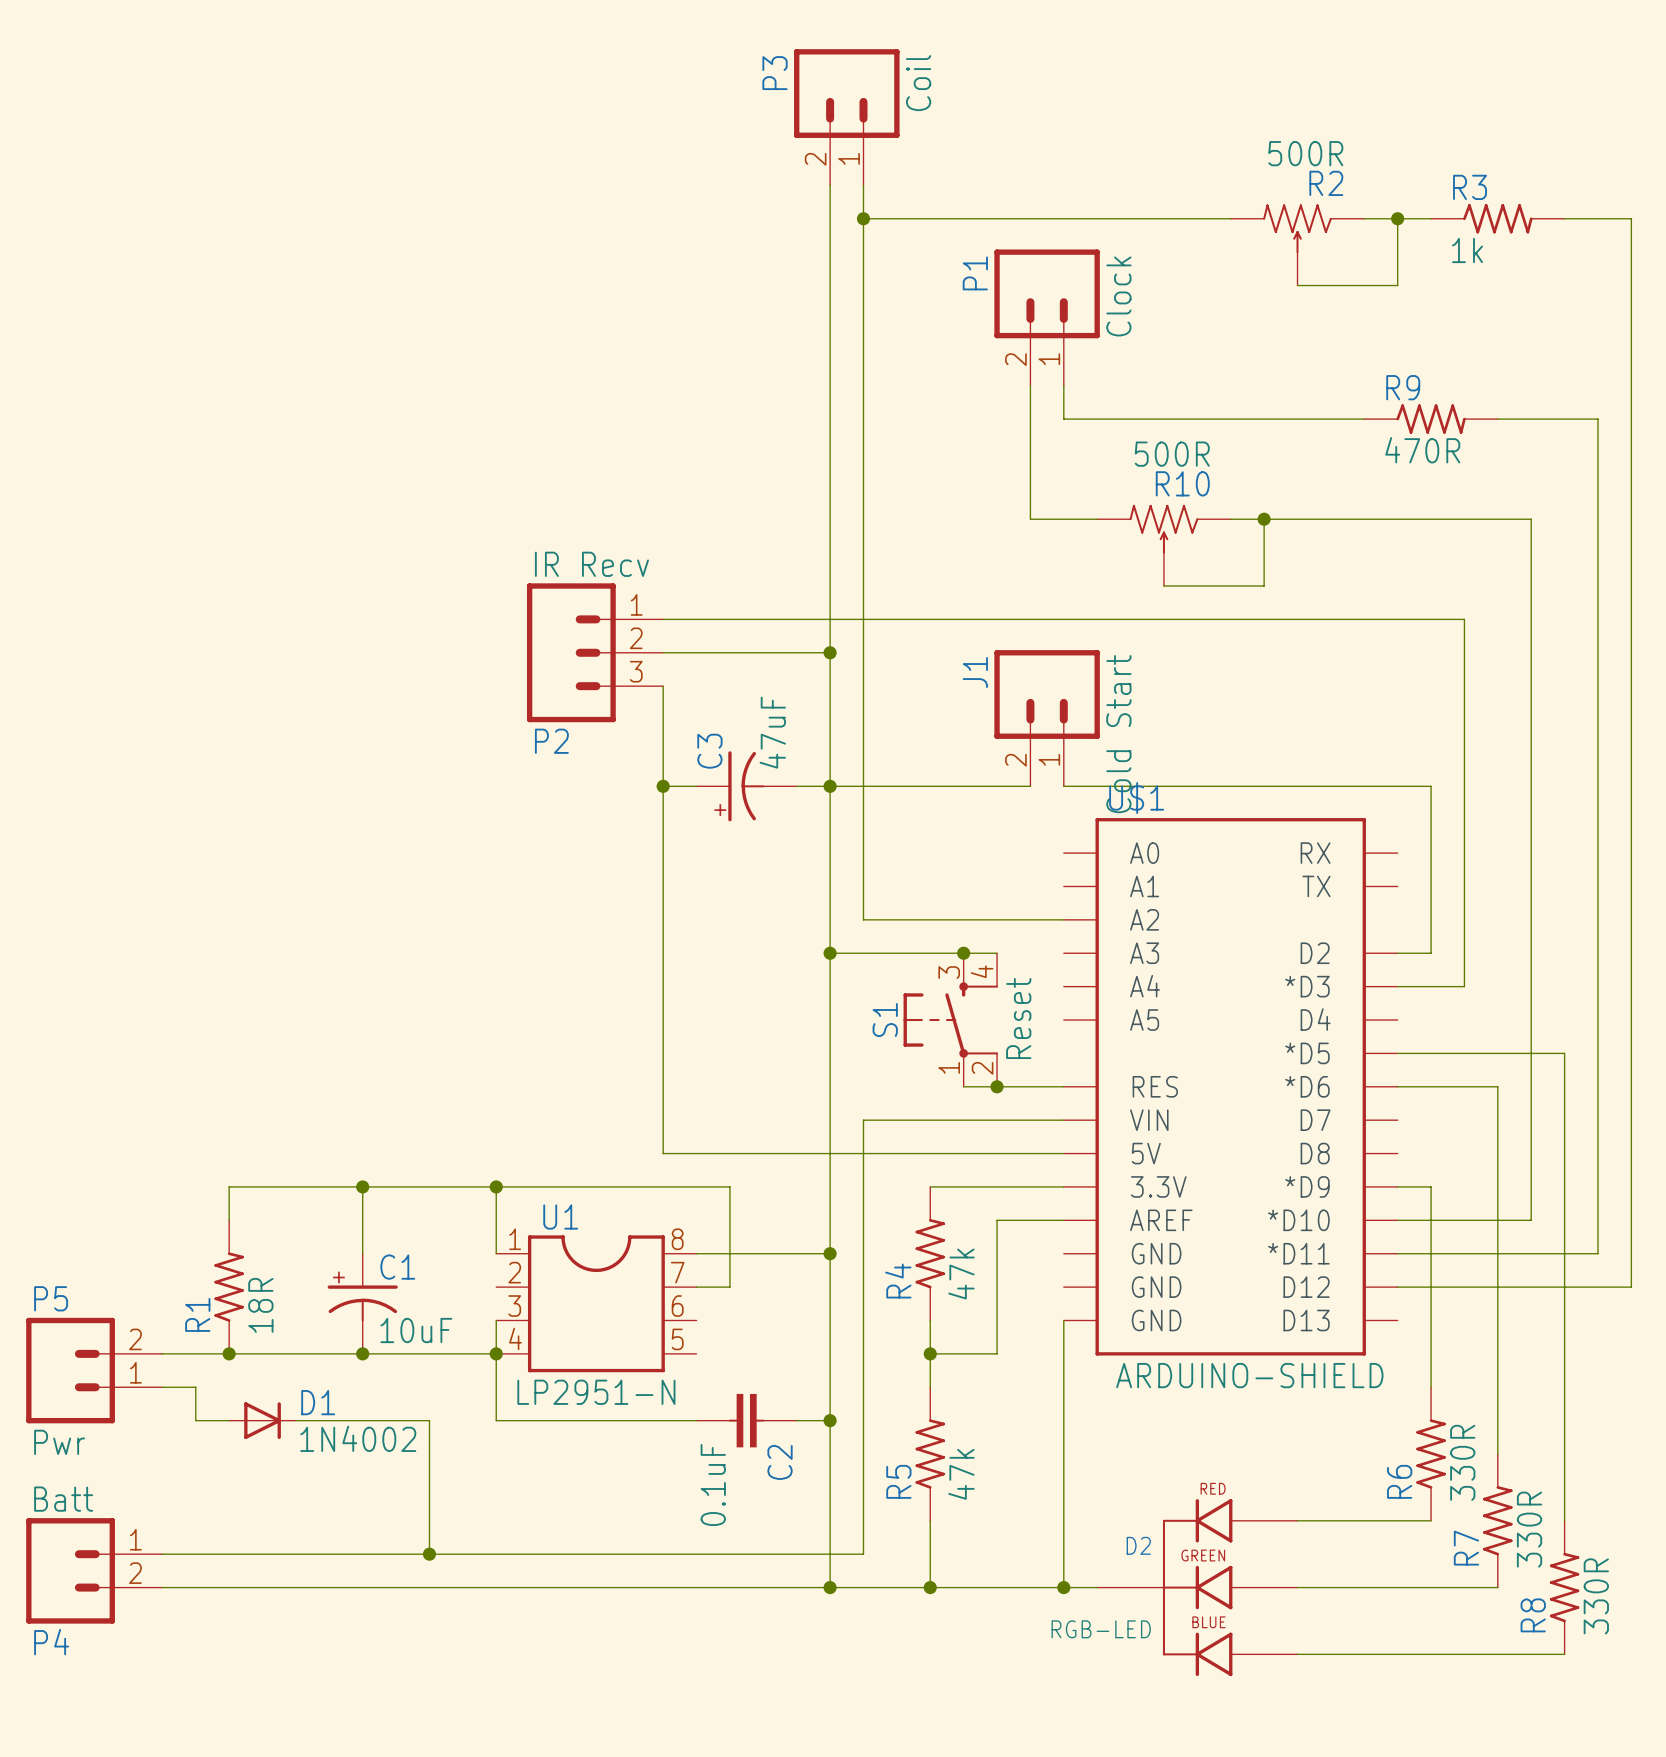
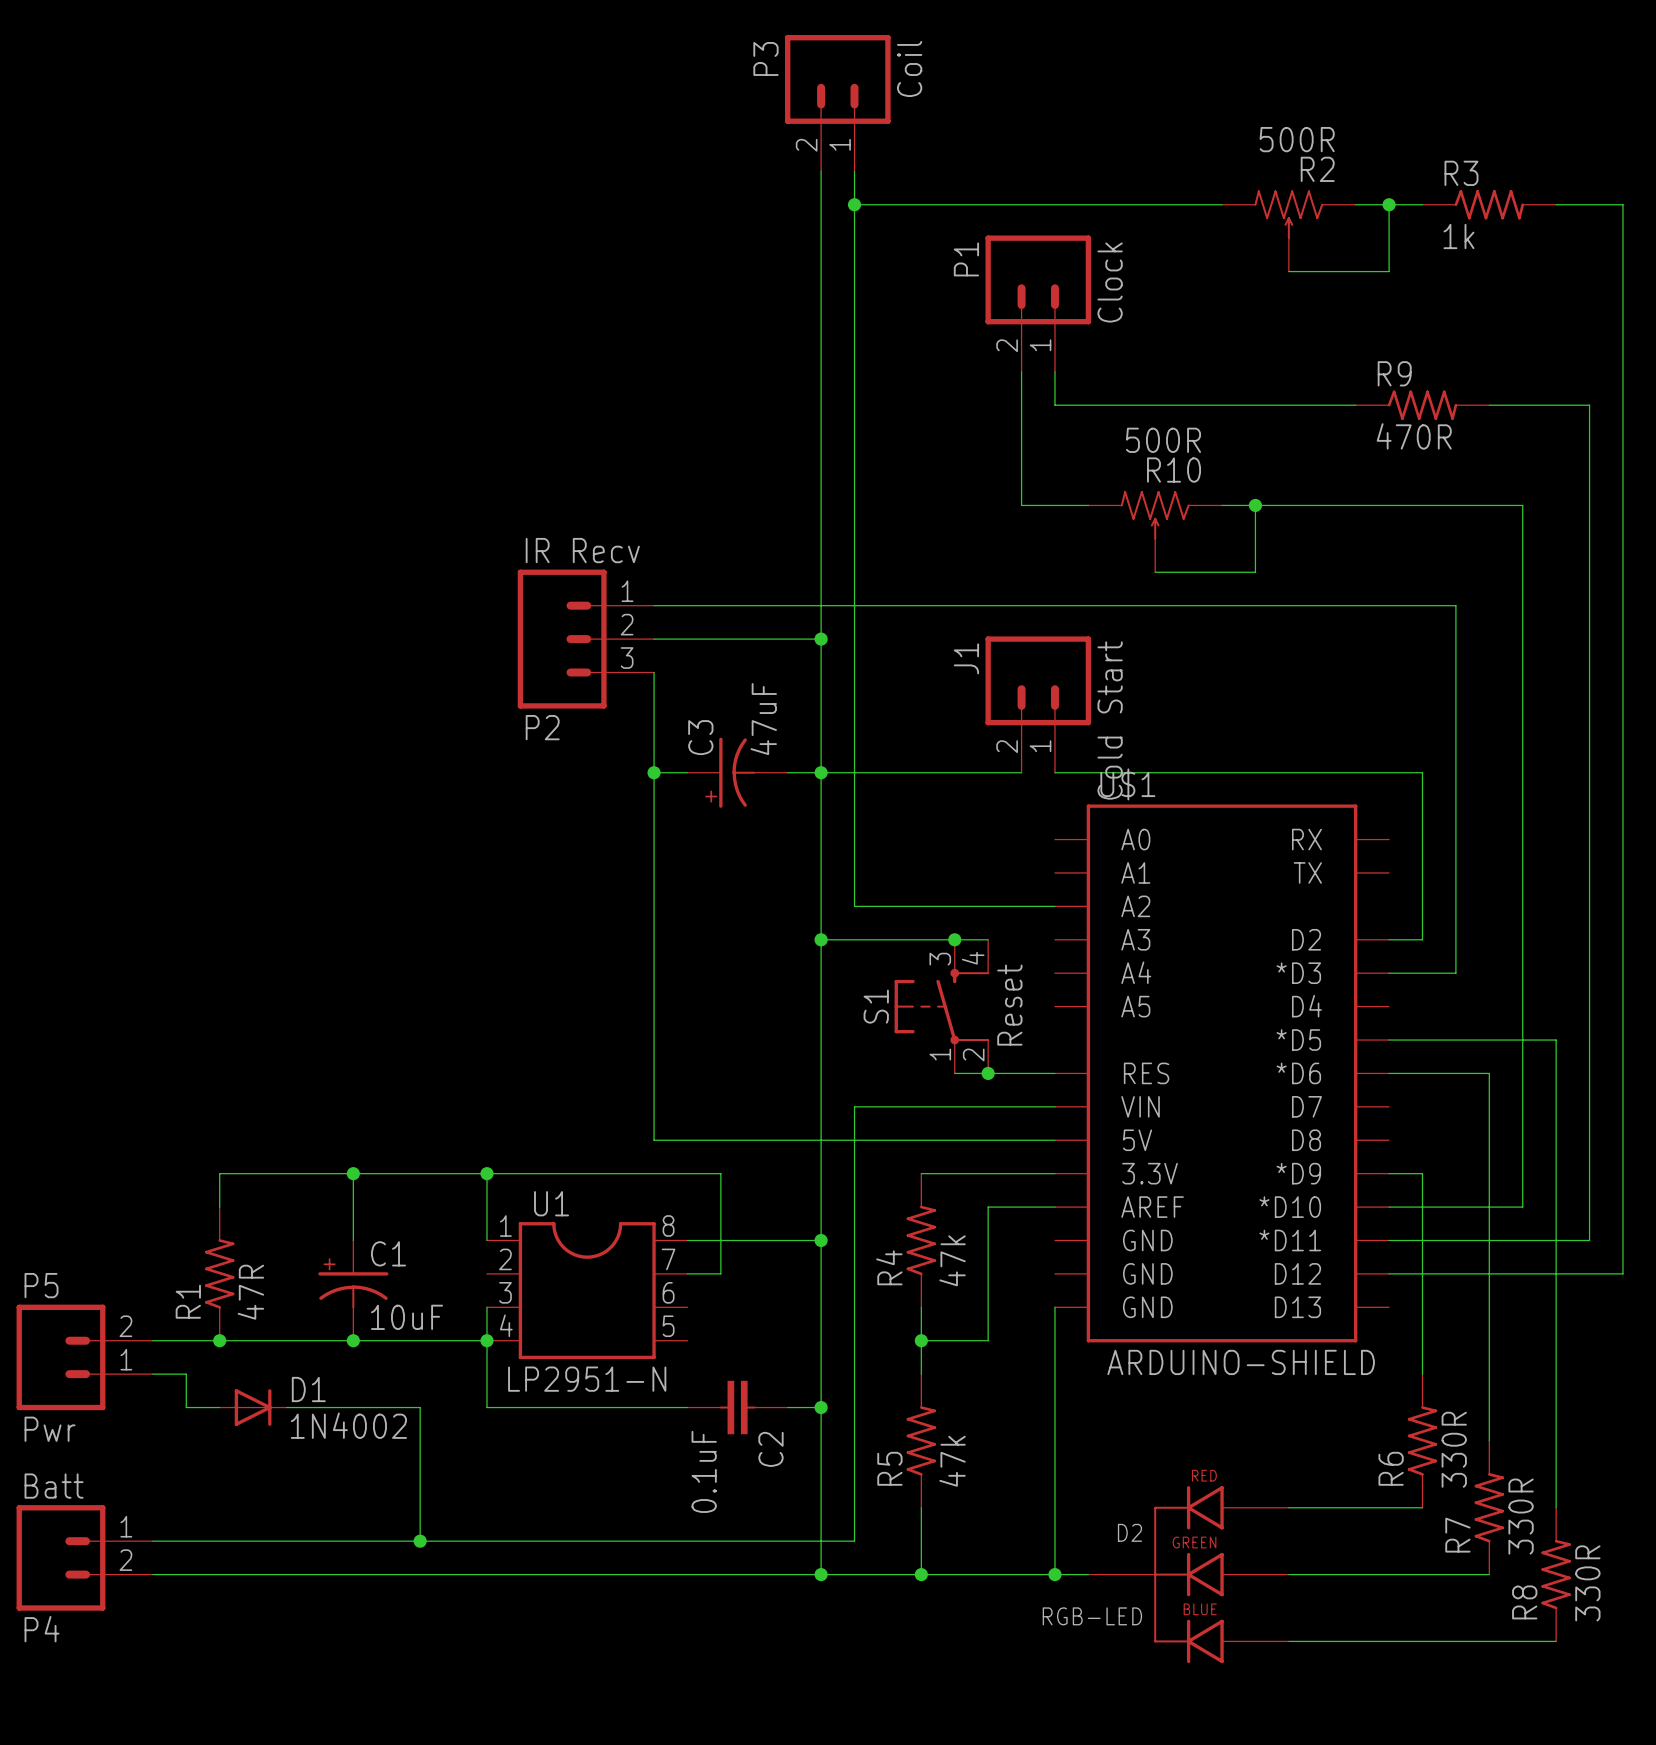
R1 value: 18R (260, 1305) -> 47R (250, 1292)

